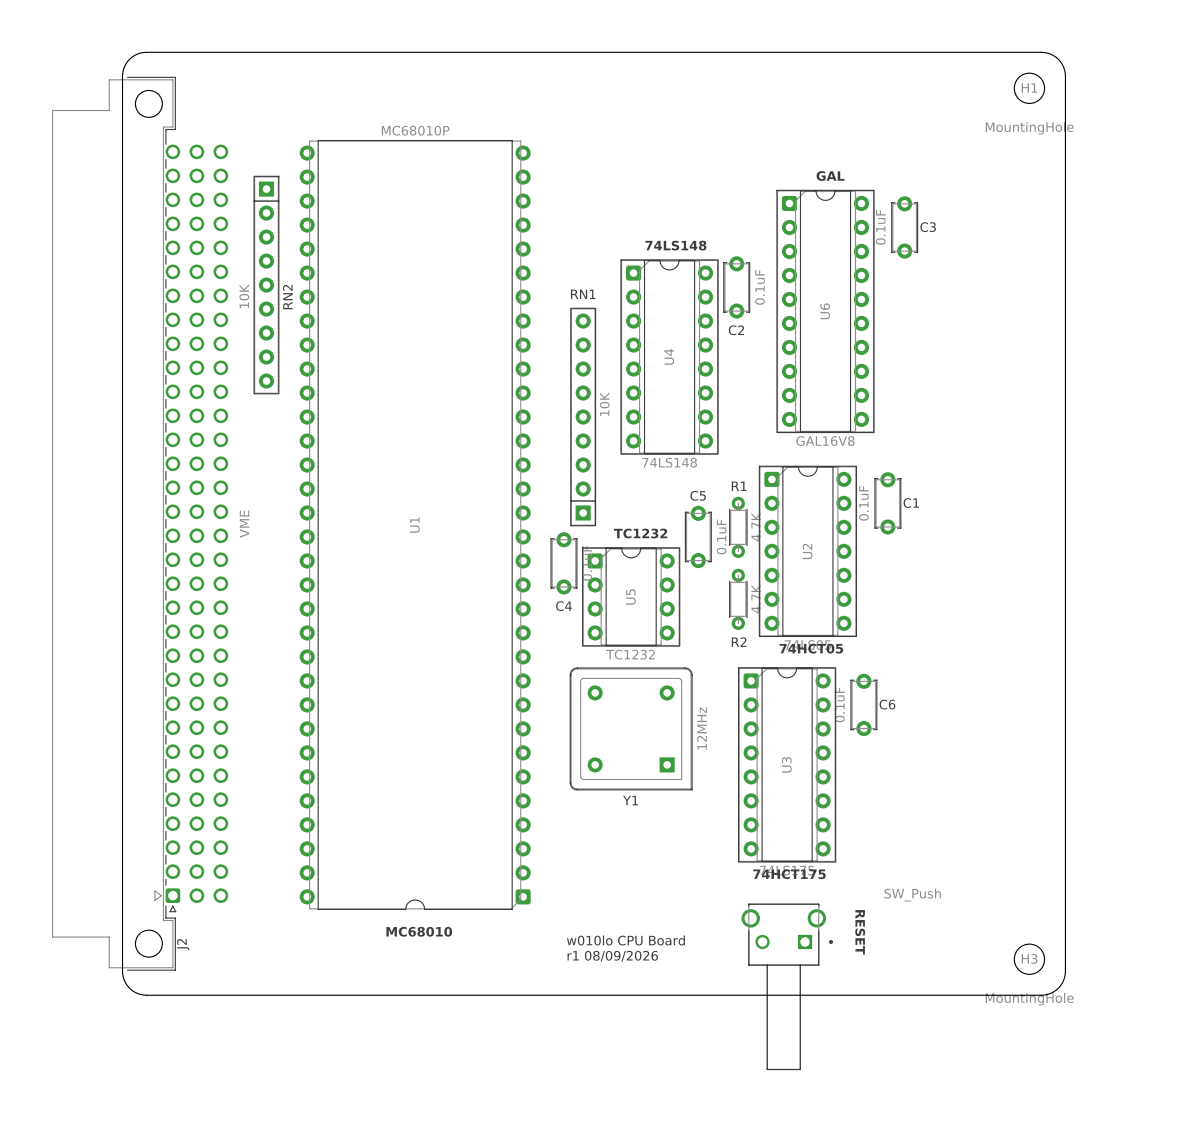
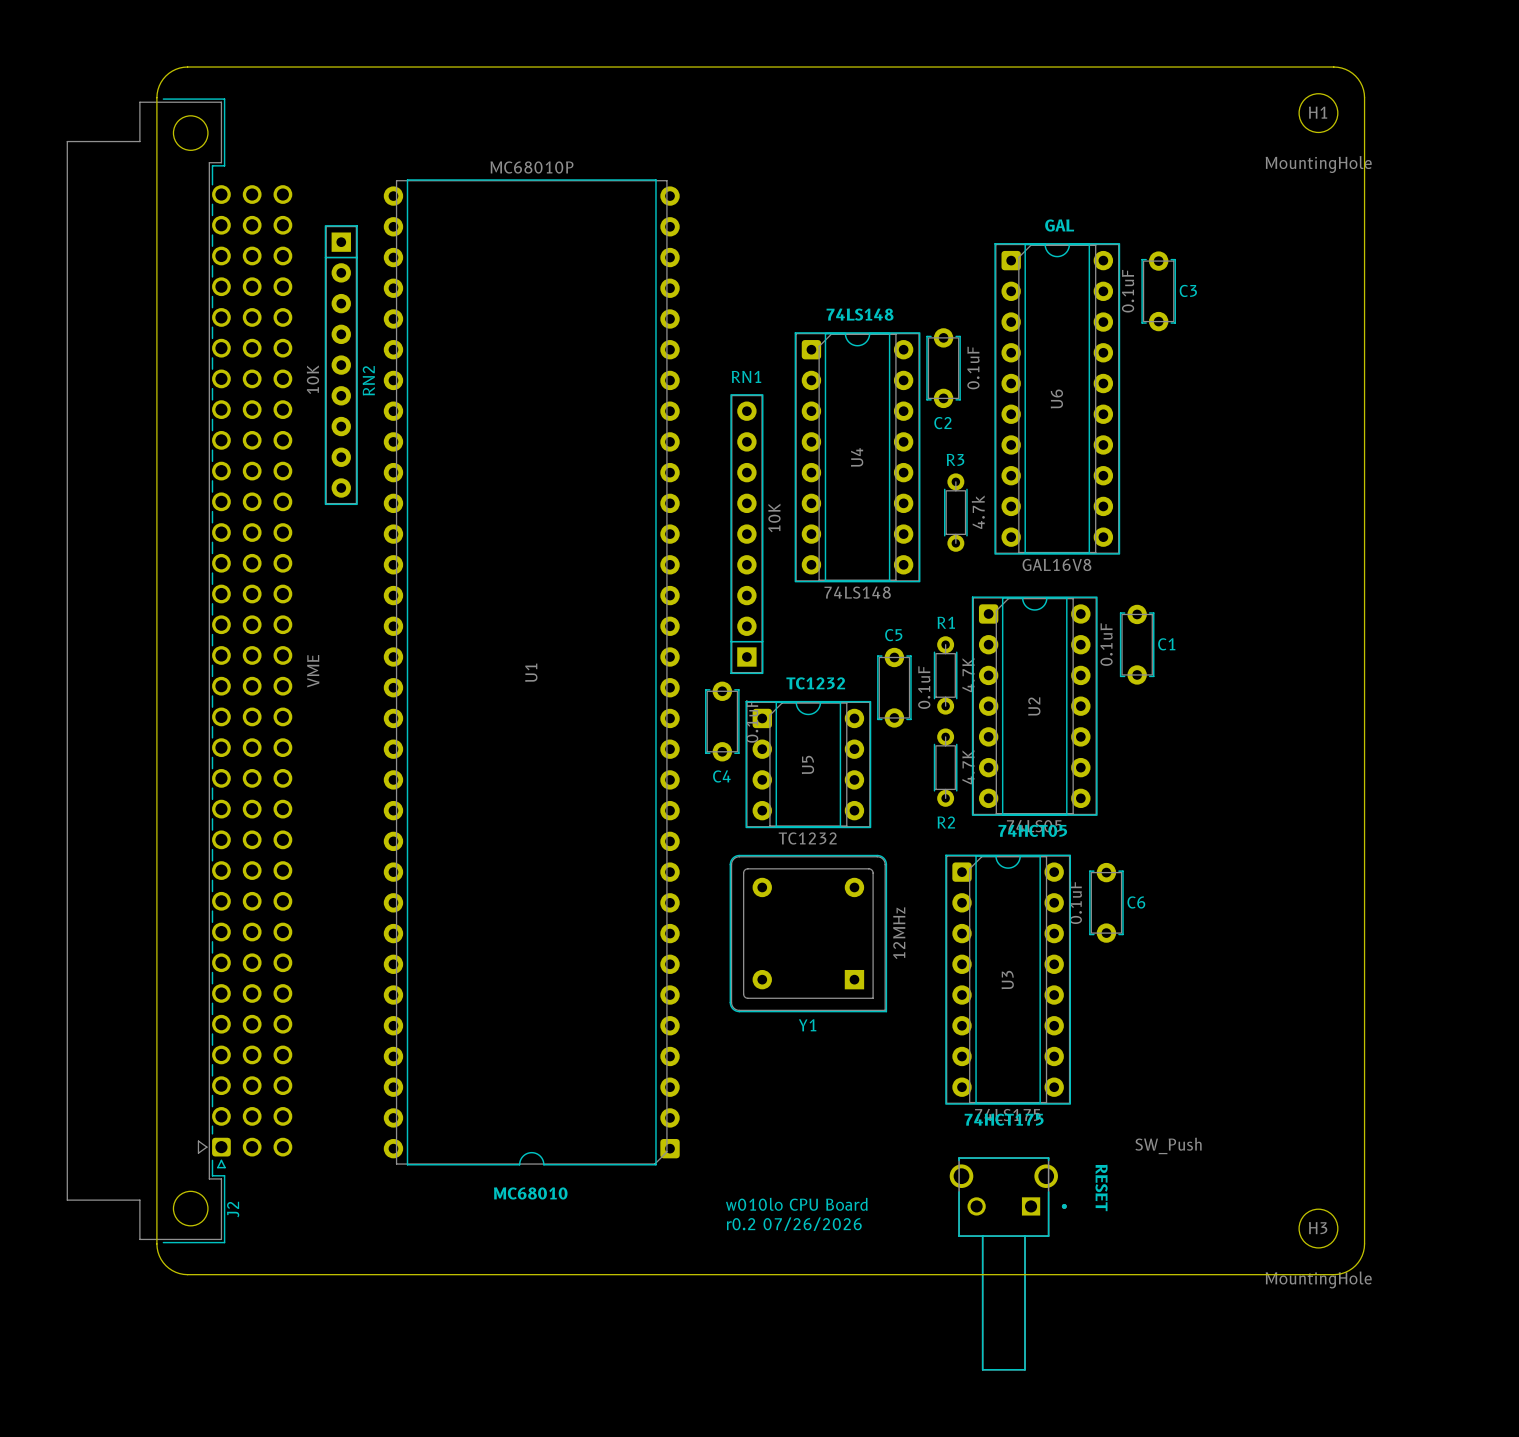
R3: none -> 4.7k (955, 512)
text: r1 08/09/2026 (612, 956) -> r0.2 07/26/2026 (794, 1224)

